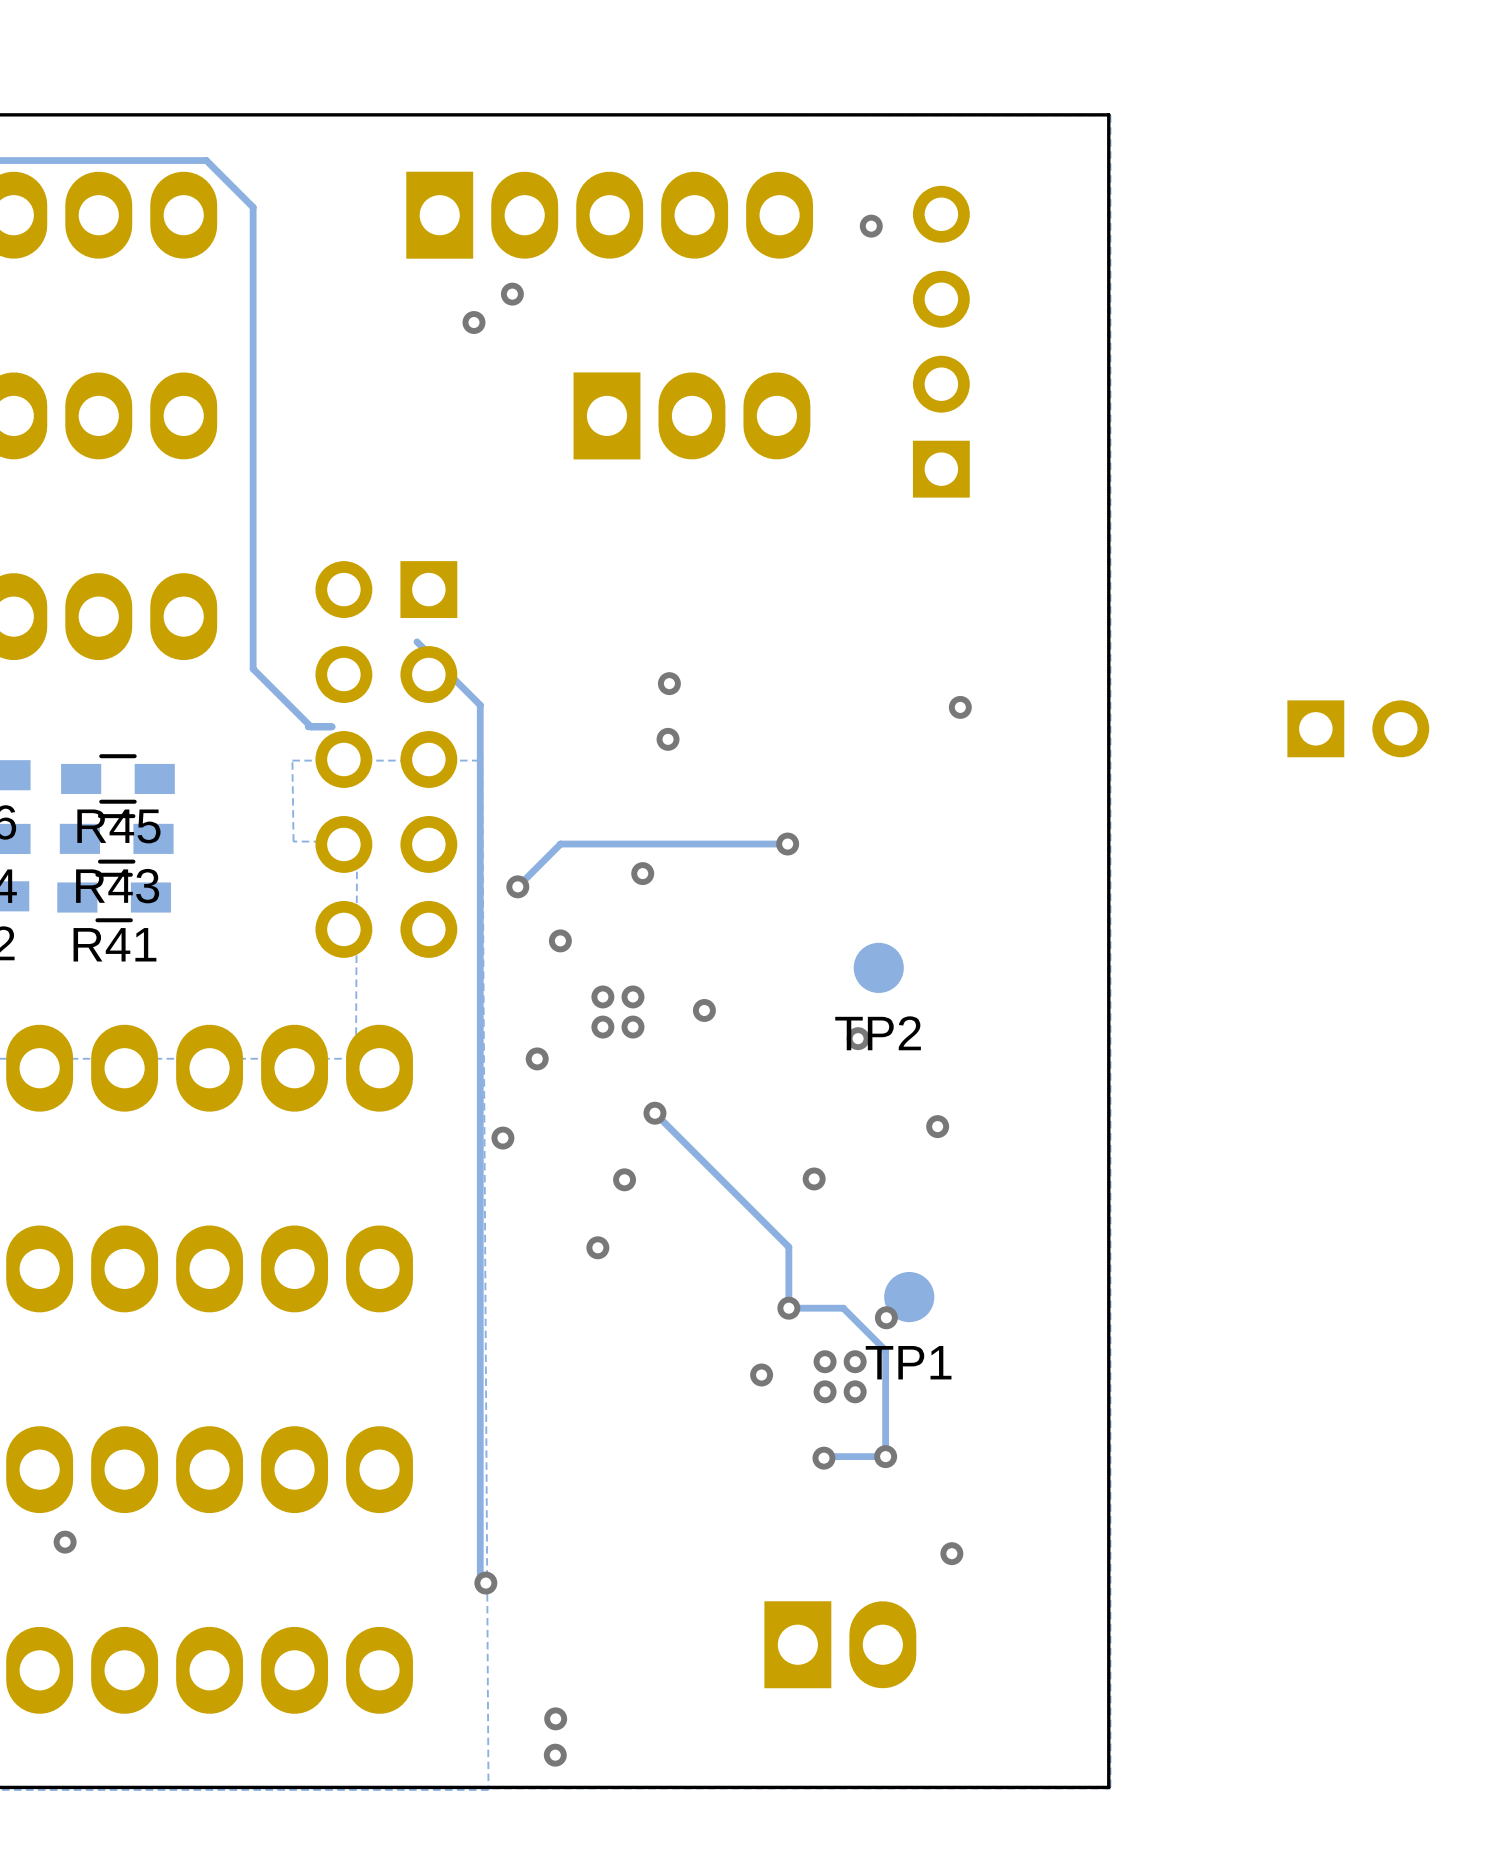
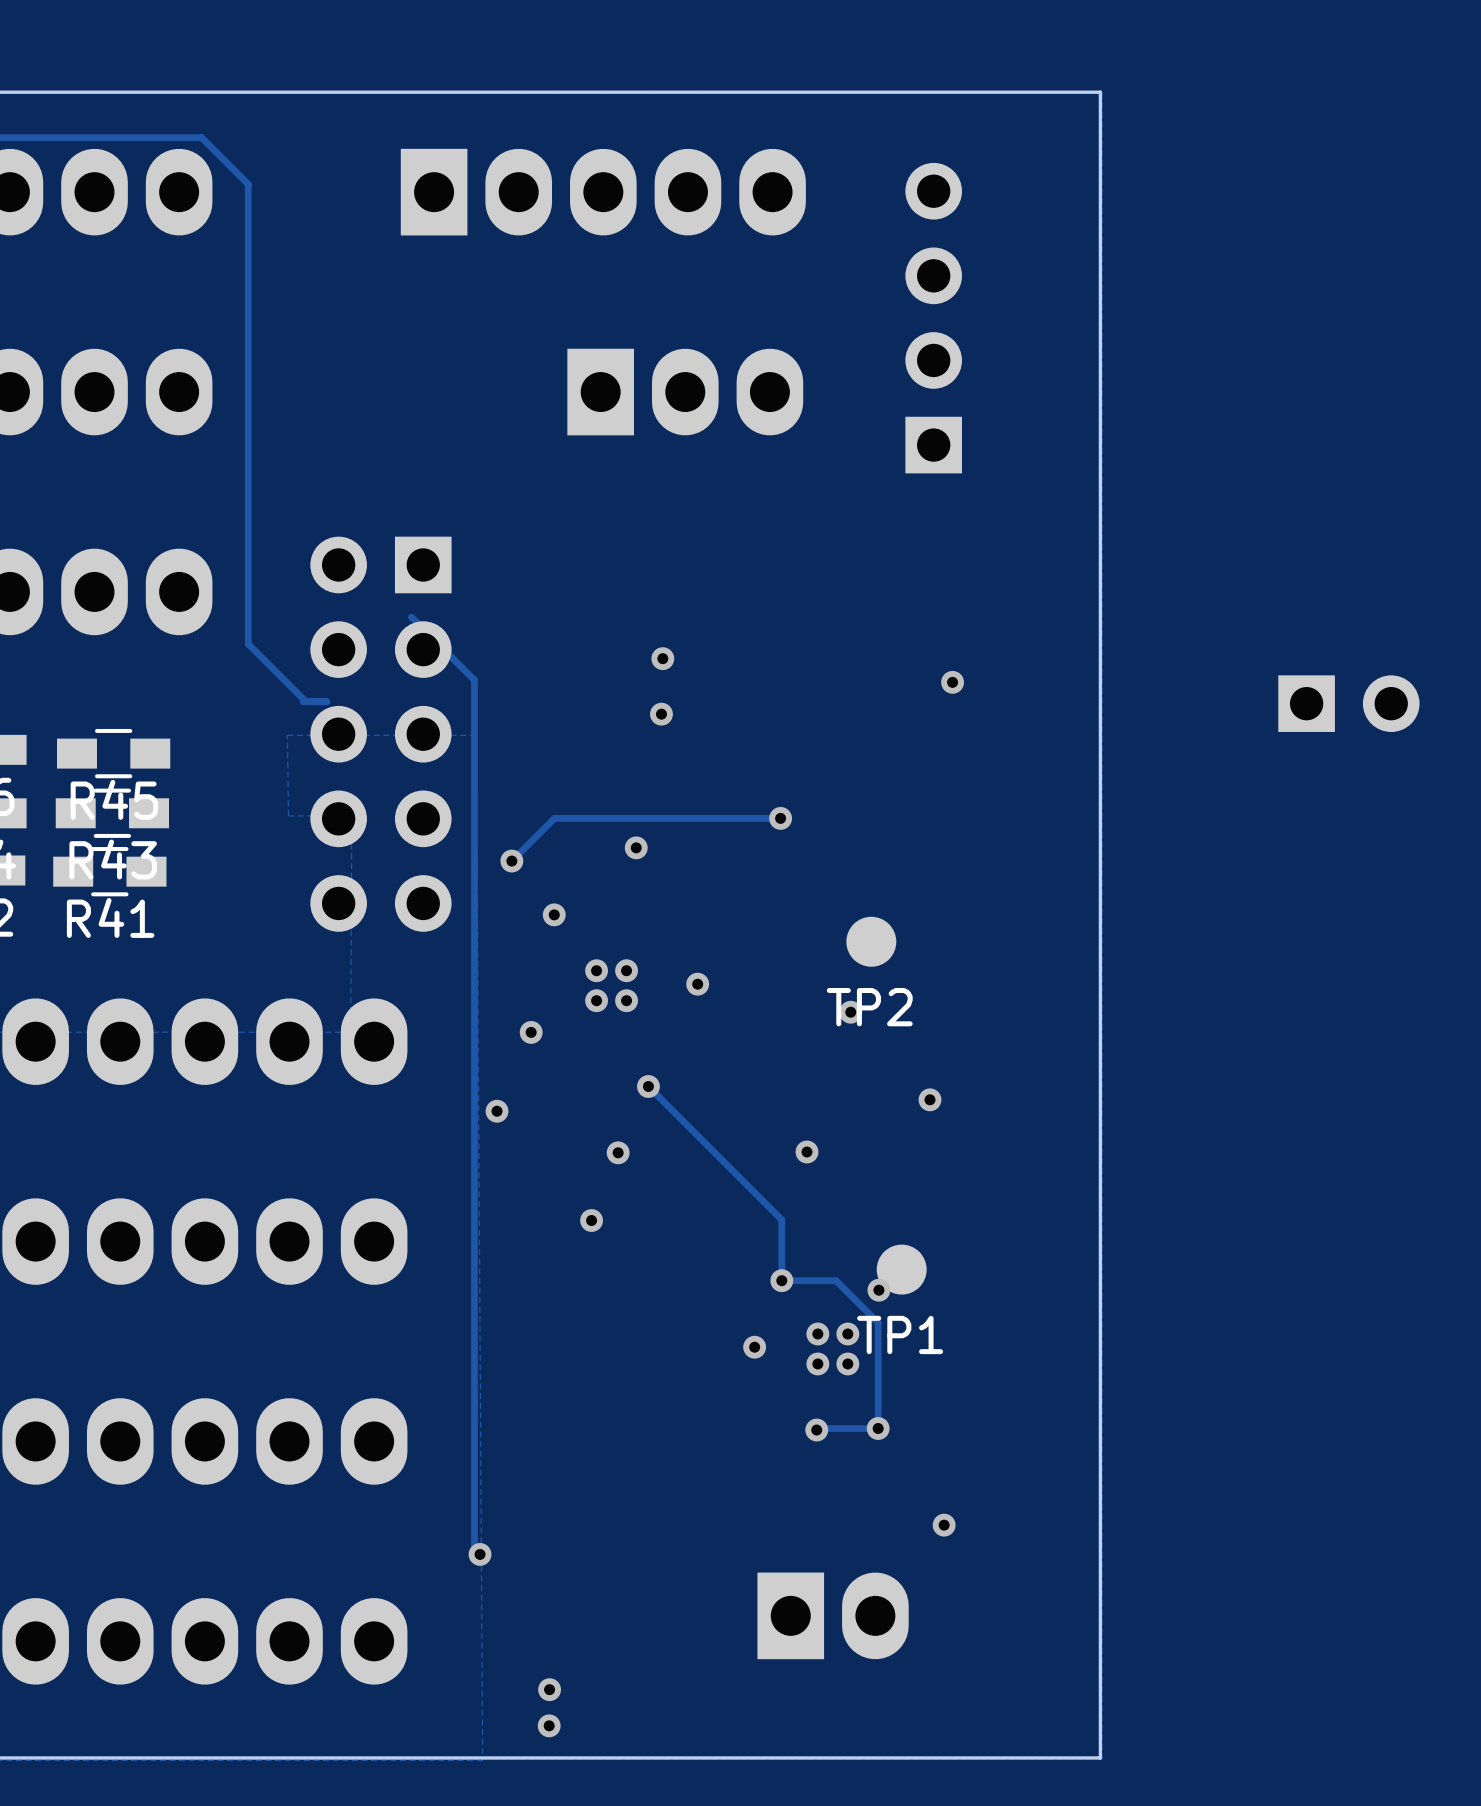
via: (871, 226) -> none
via: (512, 294) -> none
via: (473, 322) -> none
via: (65, 1542) -> none

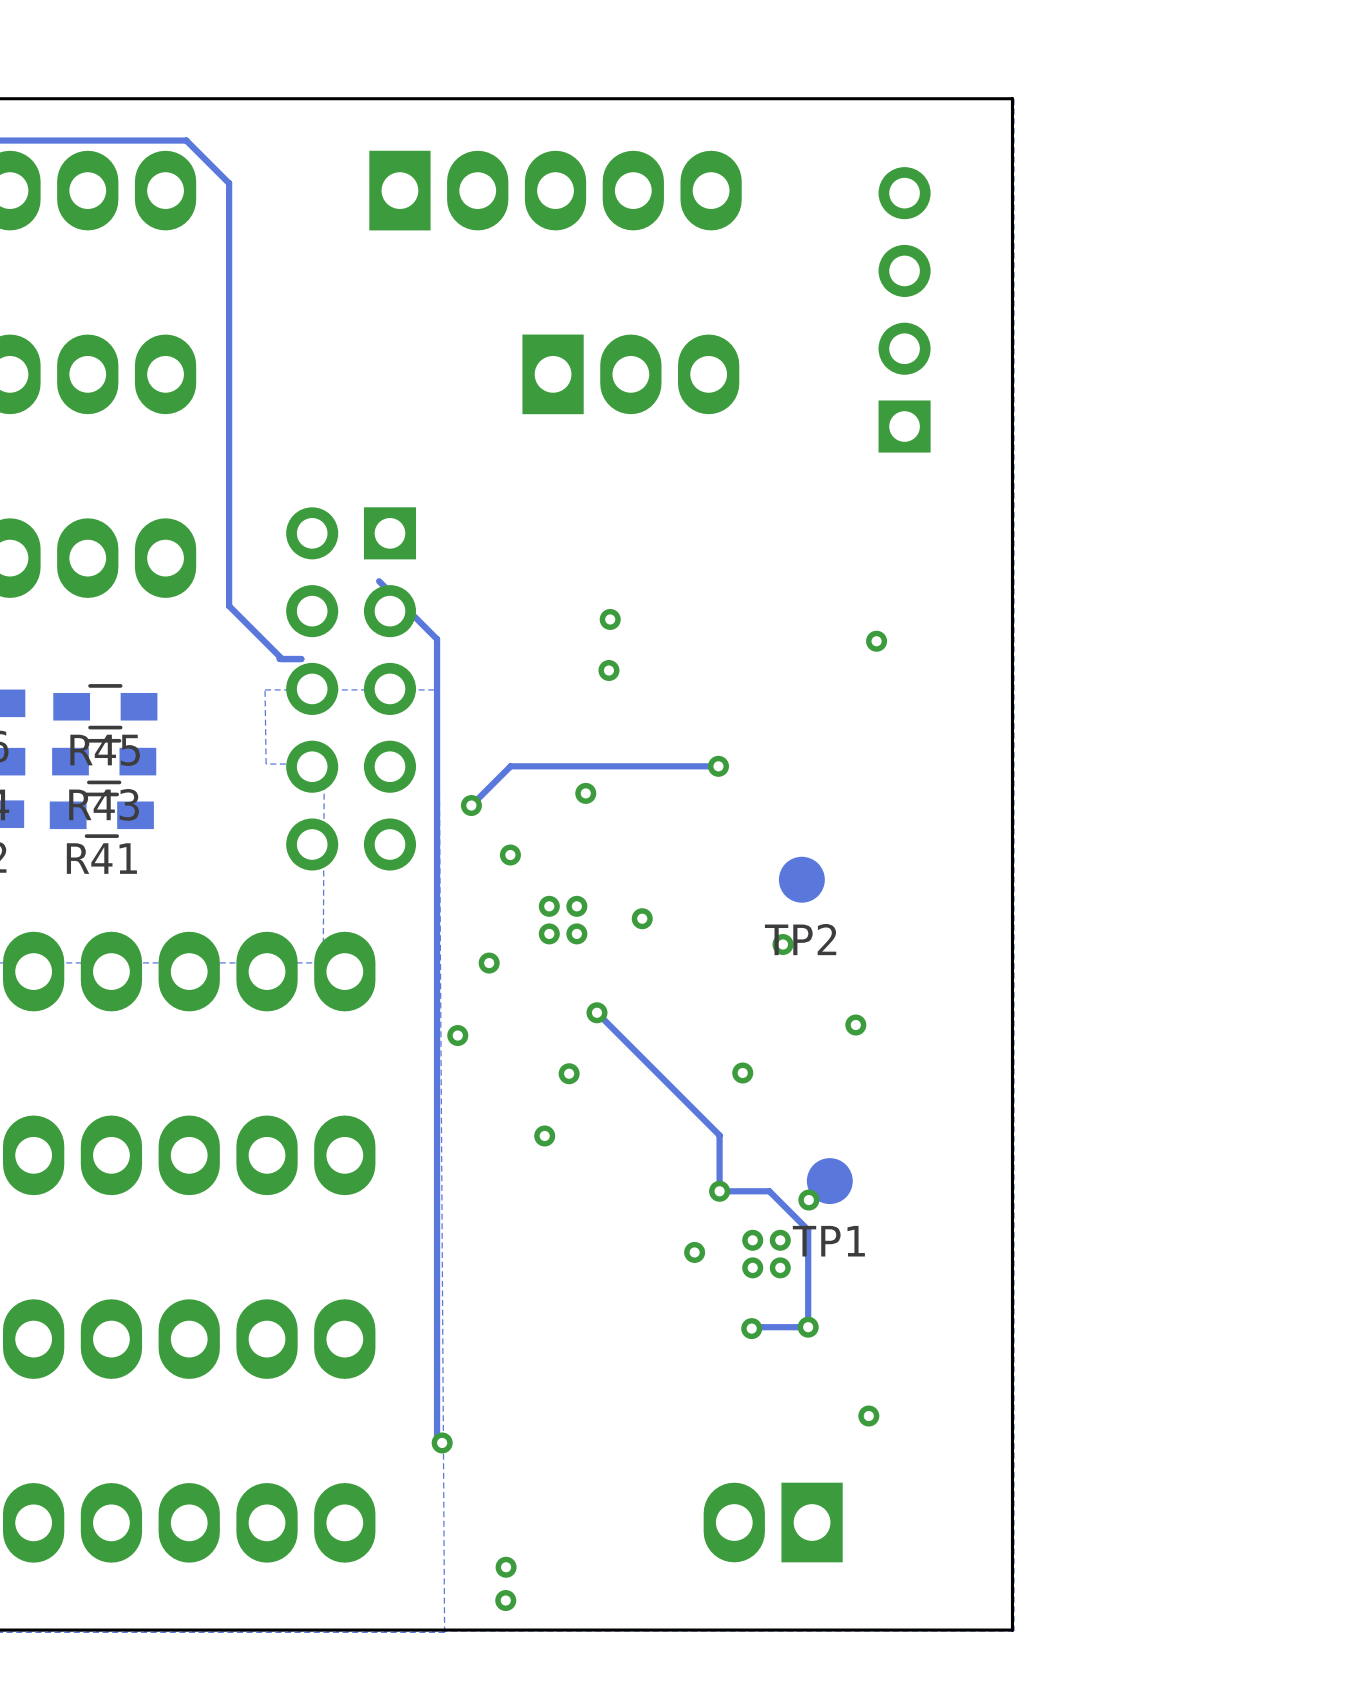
part position: (933, 318) -> (904, 309)
part: (1348, 703) -> none
part rotation: 0° (833, 1615) -> 180° (773, 1522)

